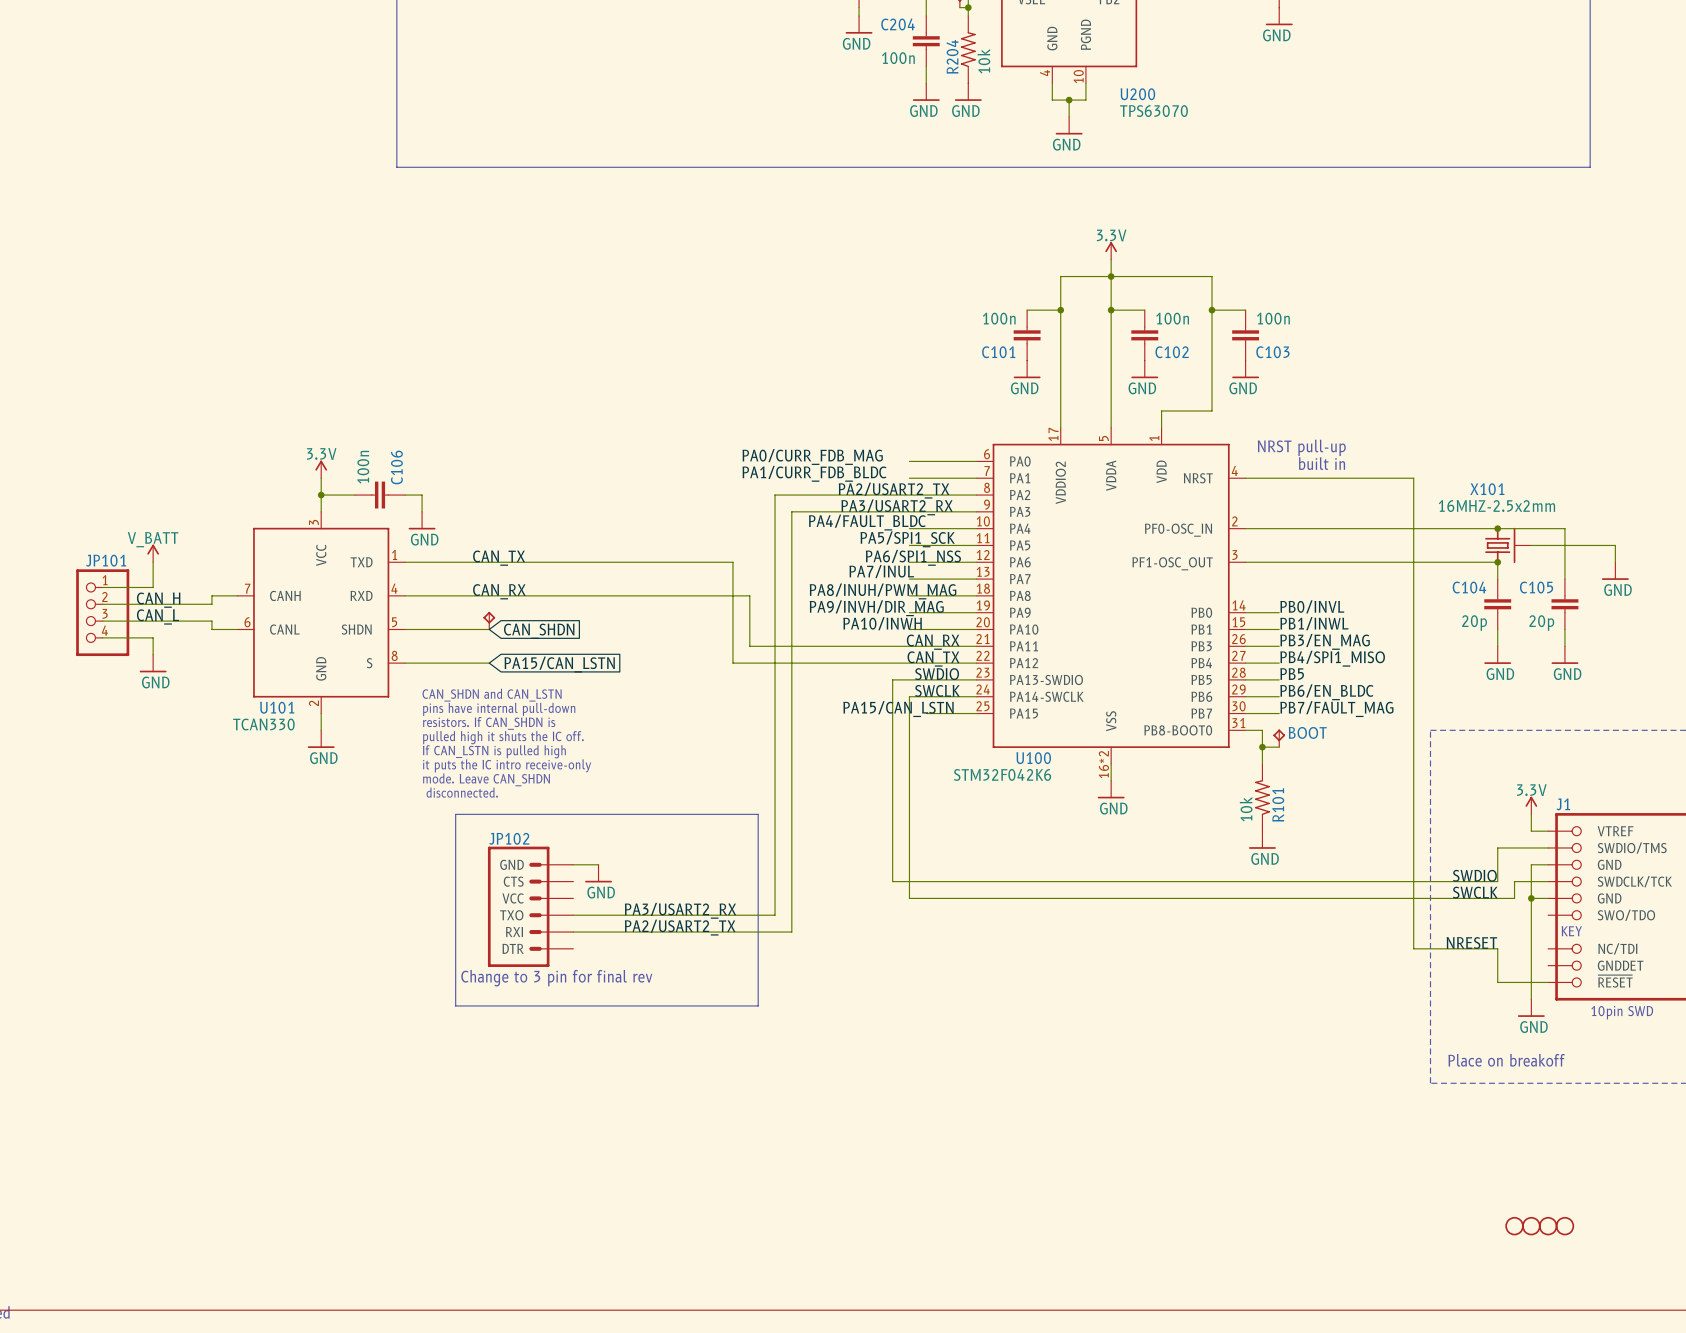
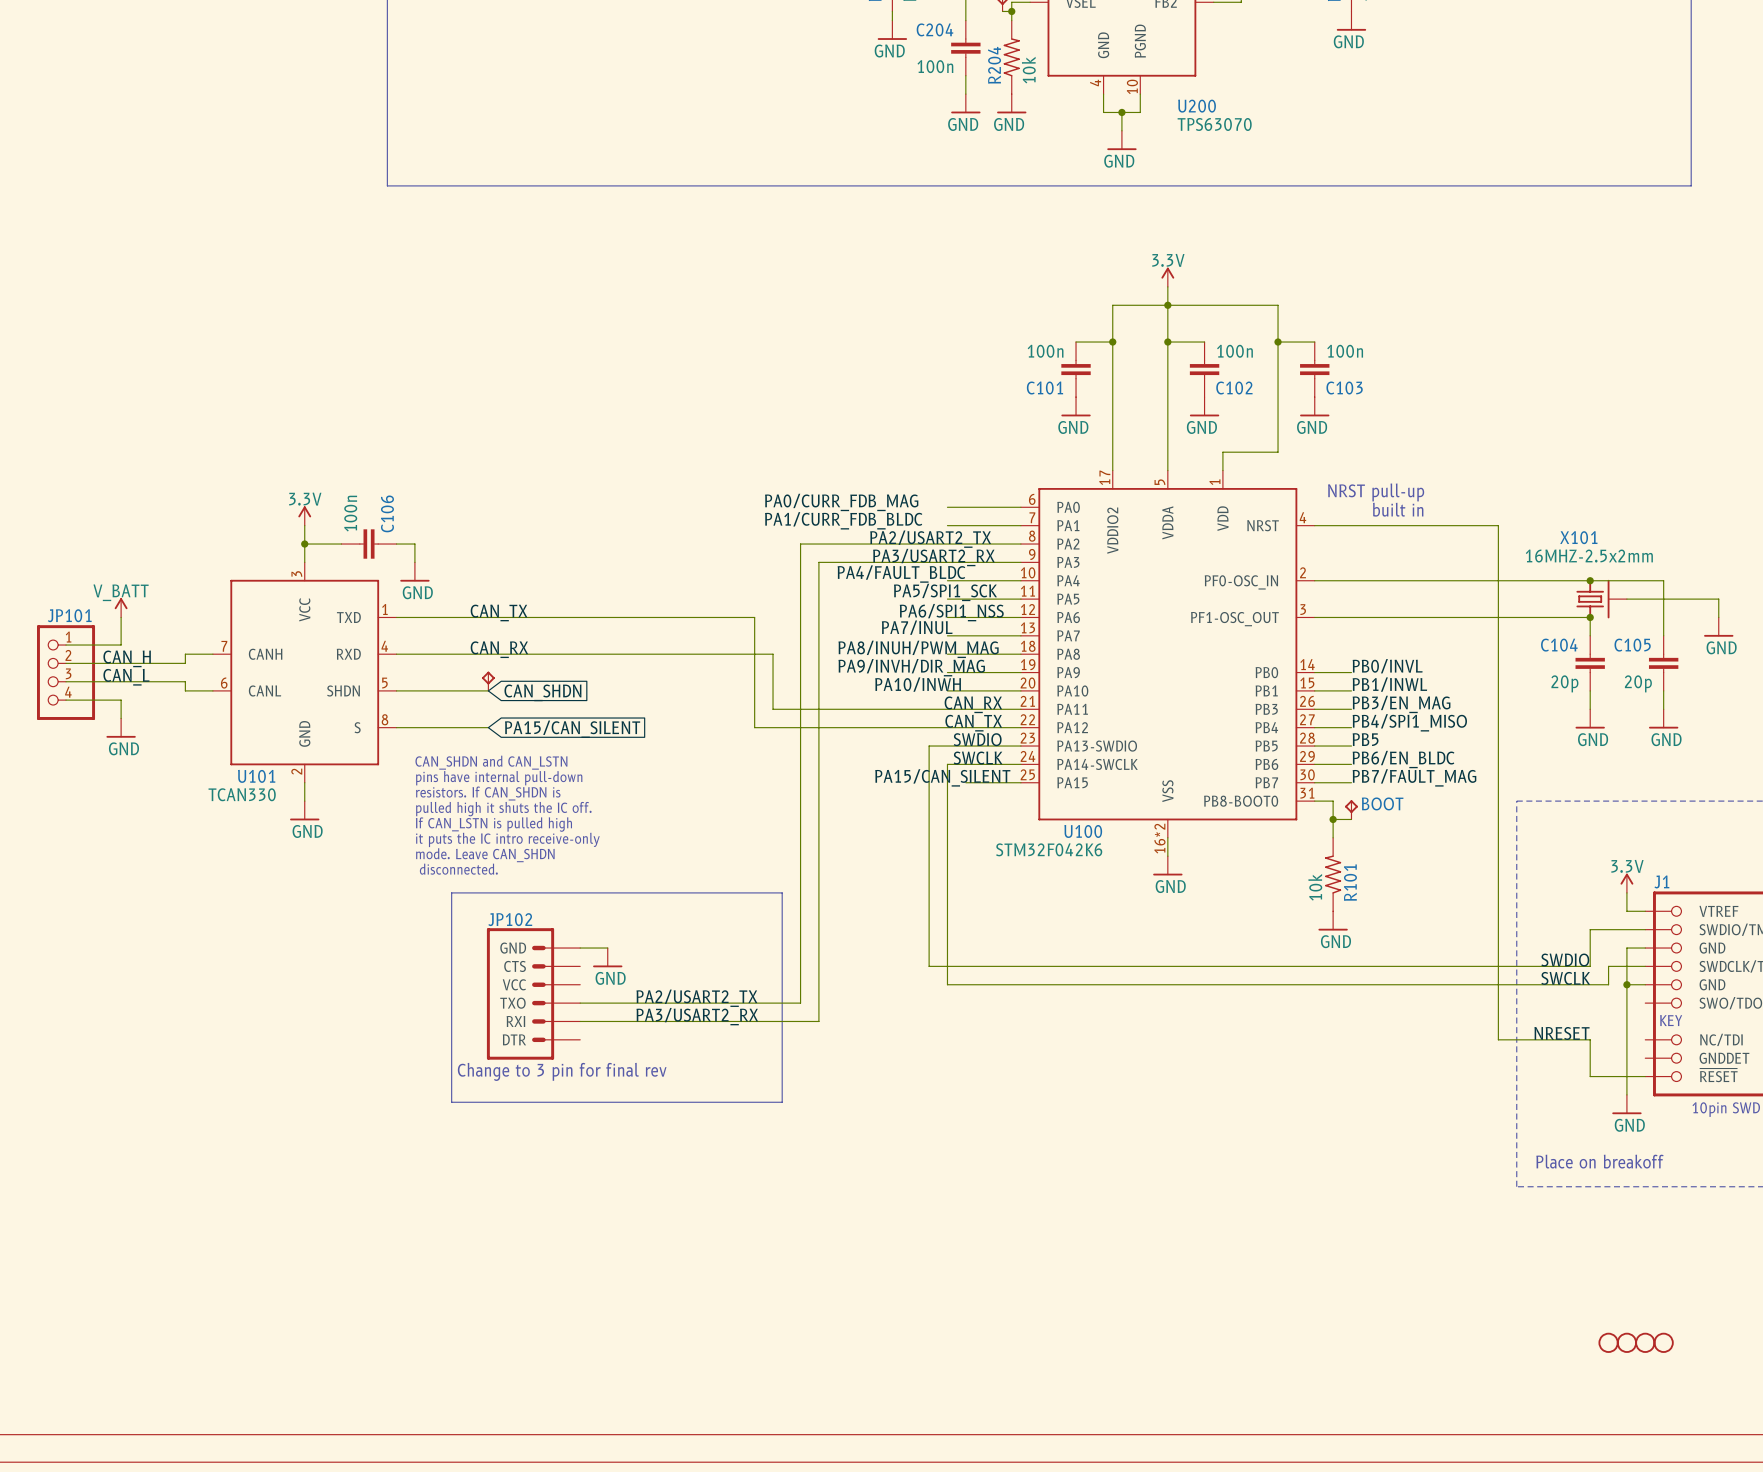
global label: PA15/CAN_LSTN (559, 664) -> PA15/CAN_SILENT (572, 729)
label: PA15/CAN_LSTN (898, 709) -> PA15/CAN_SILENT (942, 777)
label: PA3/USART2_RX (680, 910) -> PA2/USART2_TX (696, 998)
label: PA2/USART2_TX (680, 927) -> PA3/USART2_RX (697, 1016)

